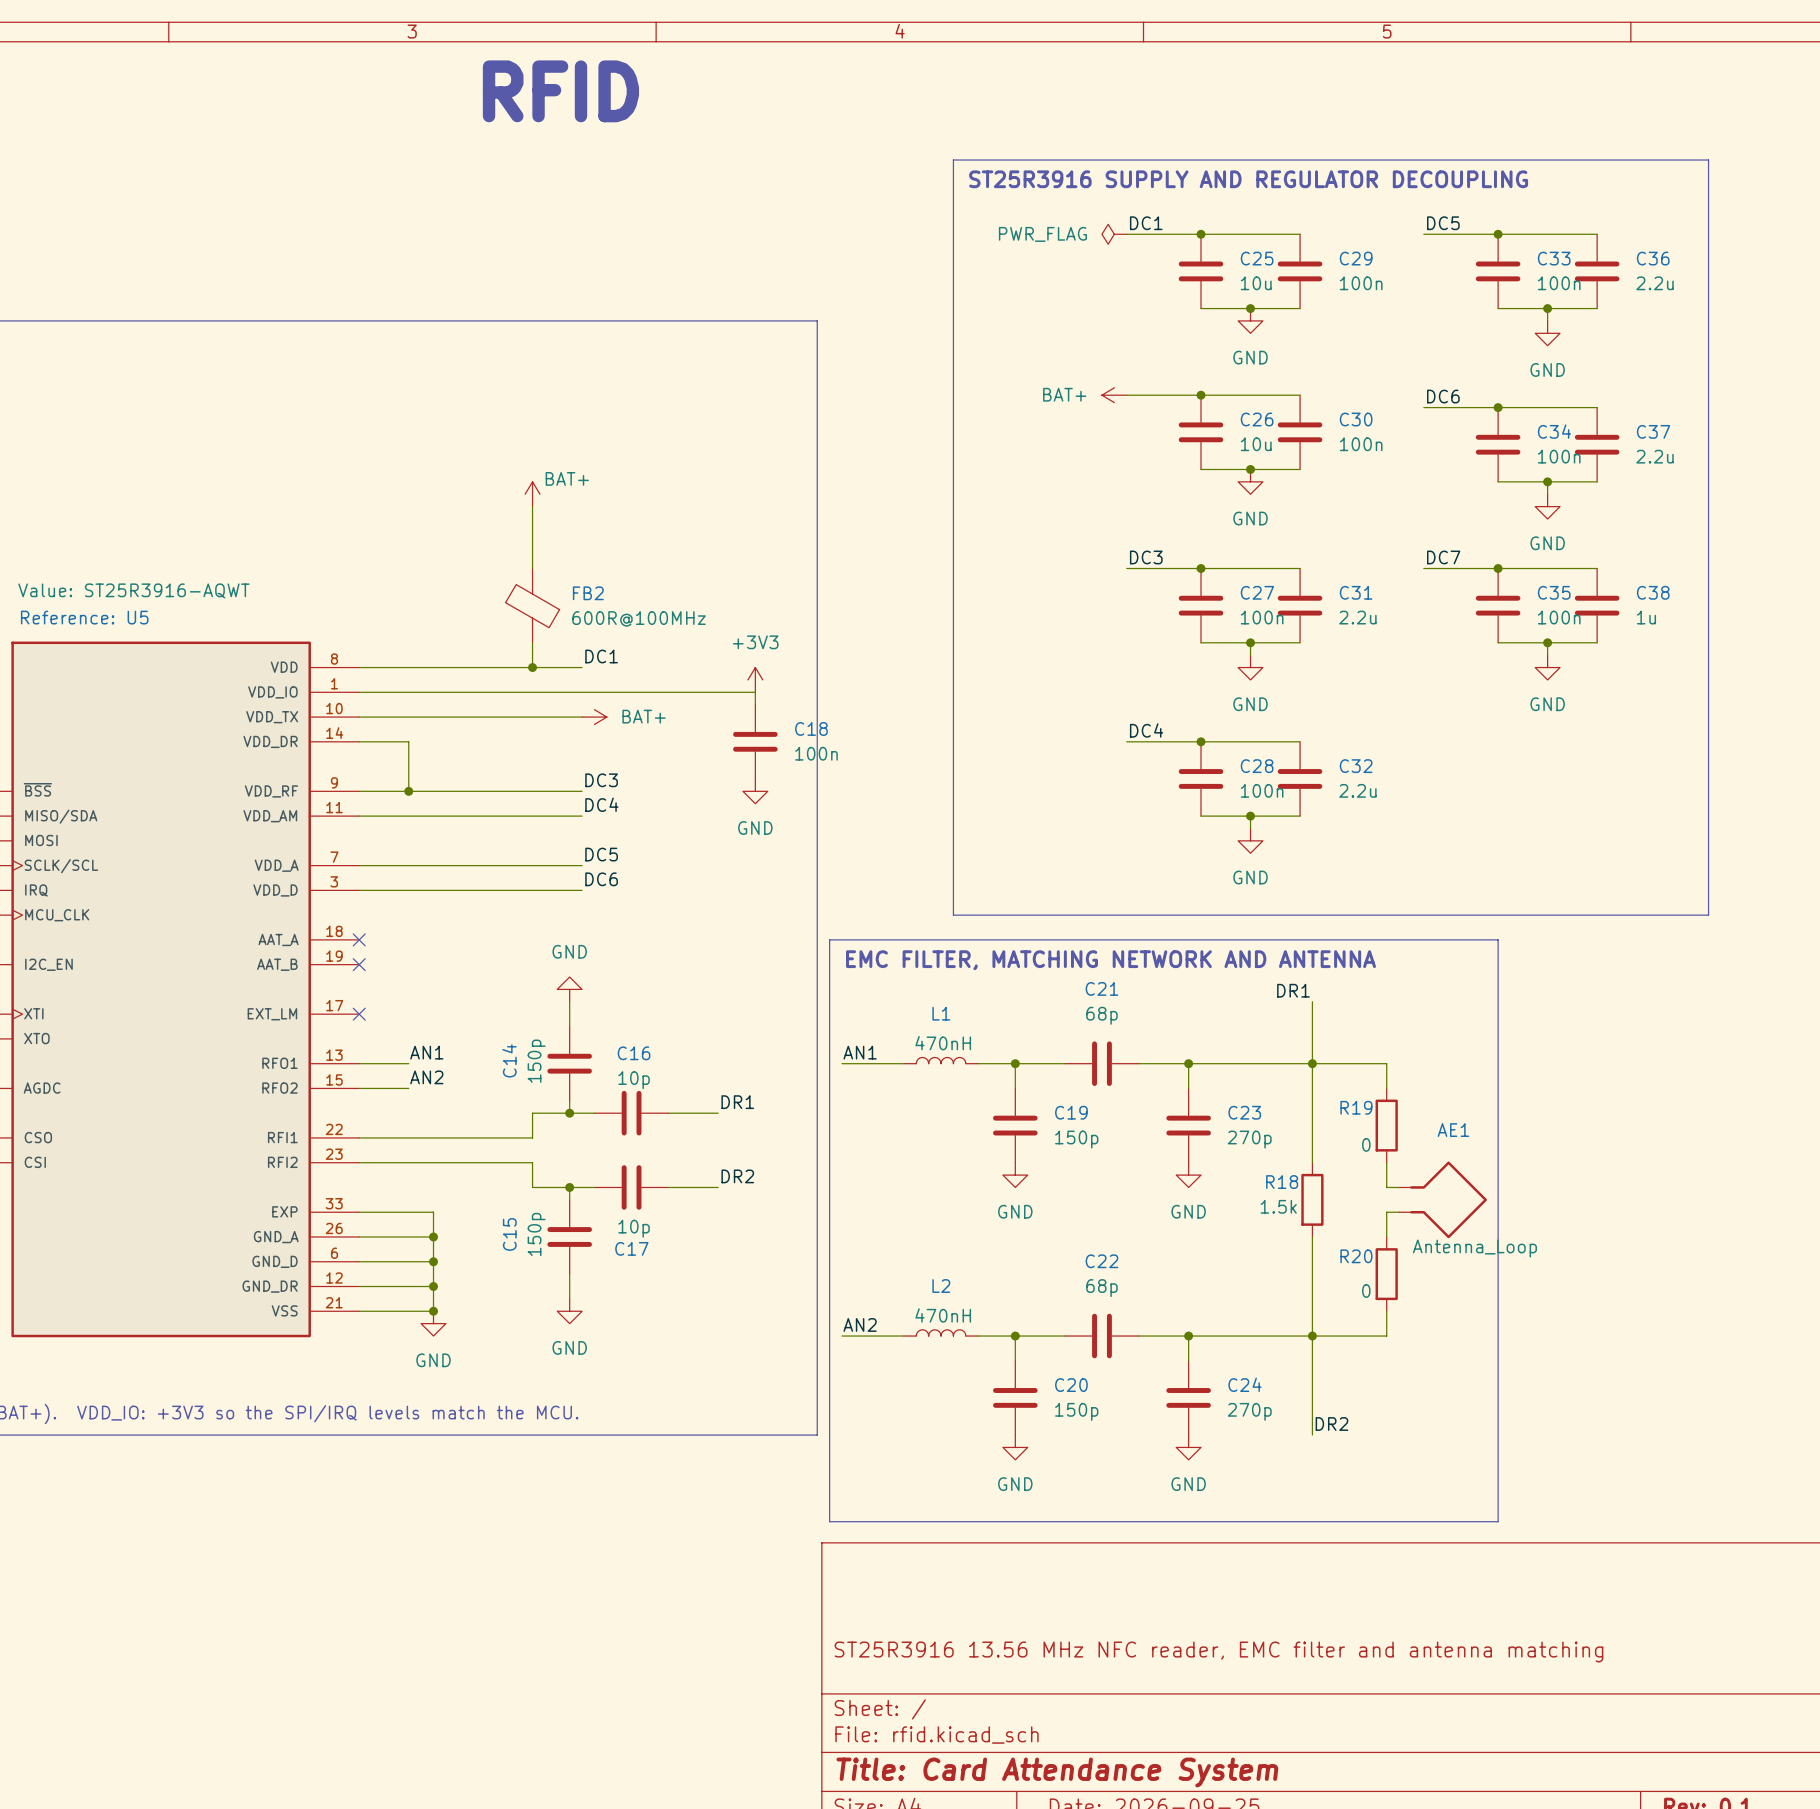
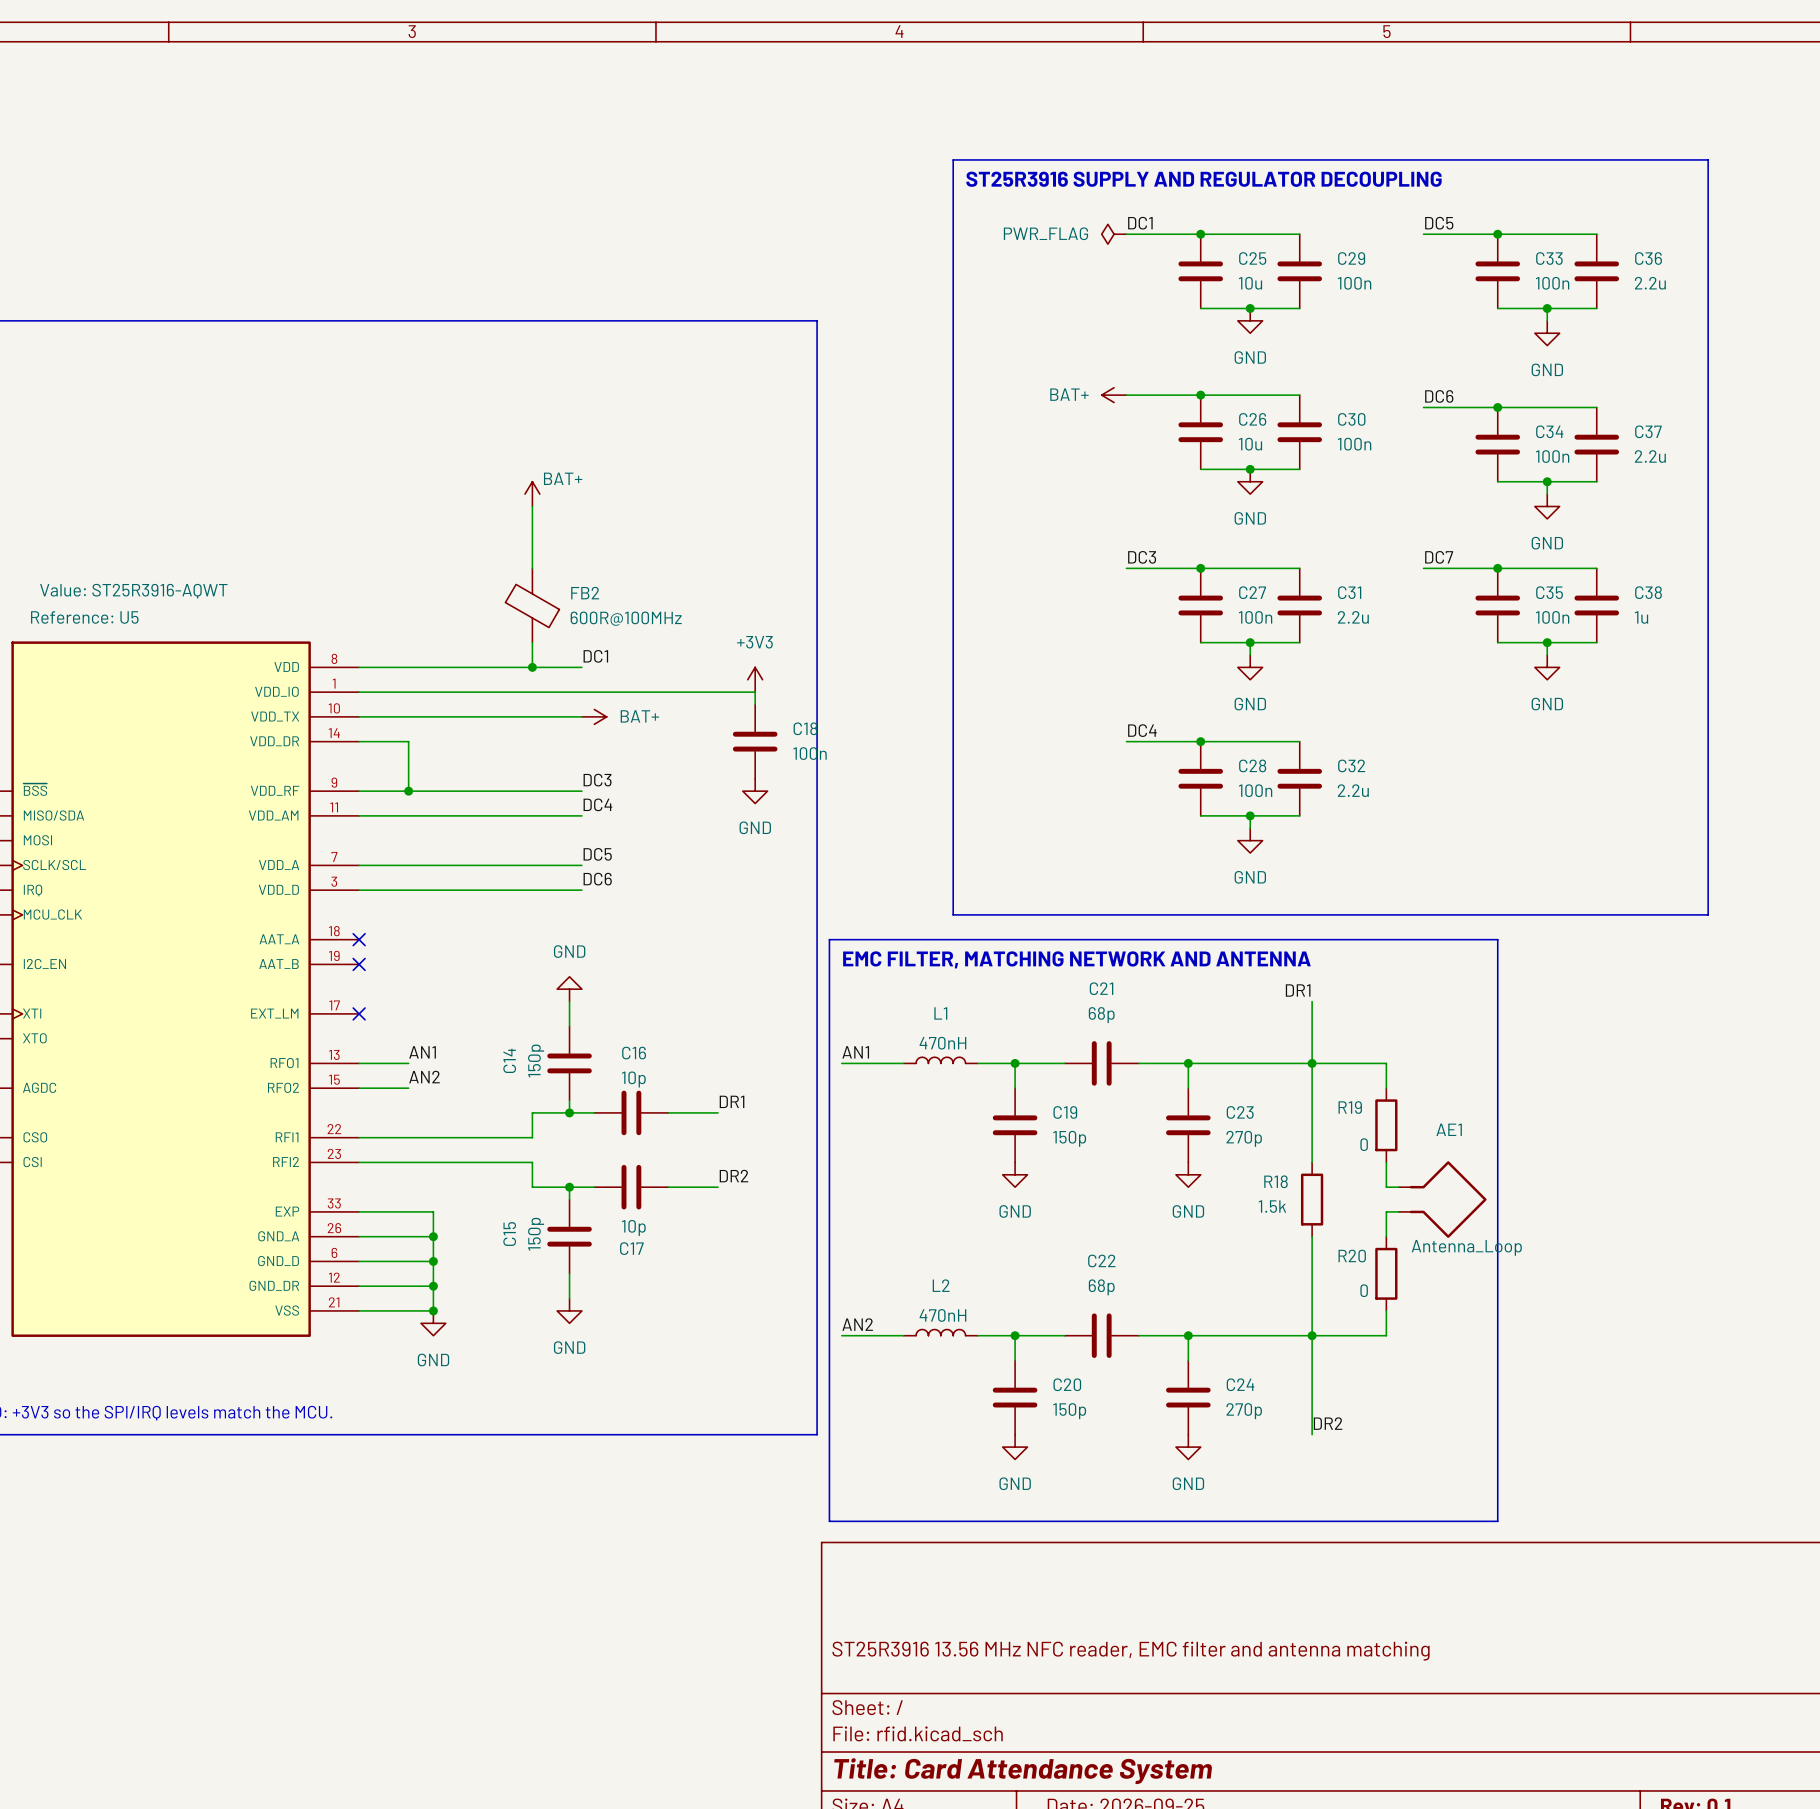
text: RFID (560, 91) -> none

